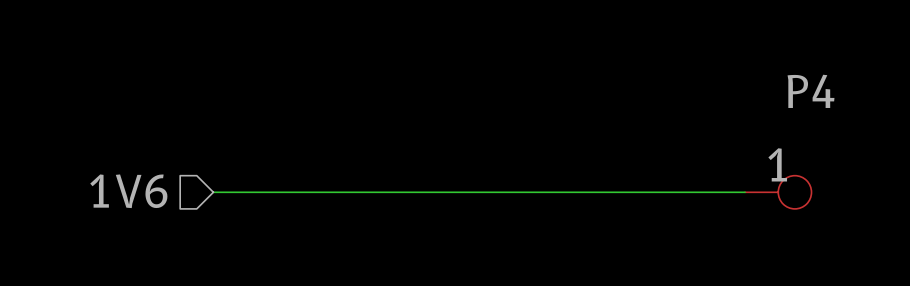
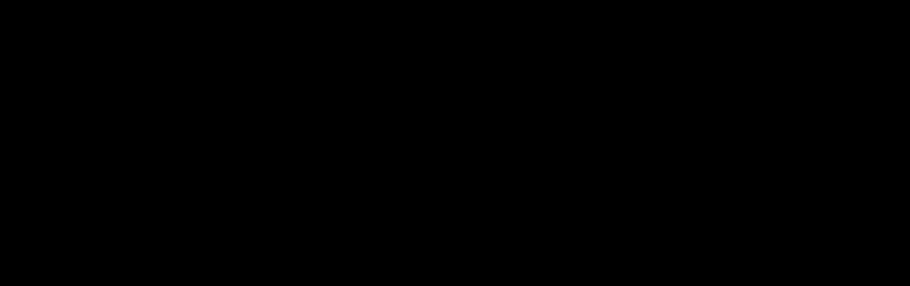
hierarchical label: 1V6 (128, 191) -> none
wire: (213, 192) (745, 192) -> none
P4: (778, 192) -> none

